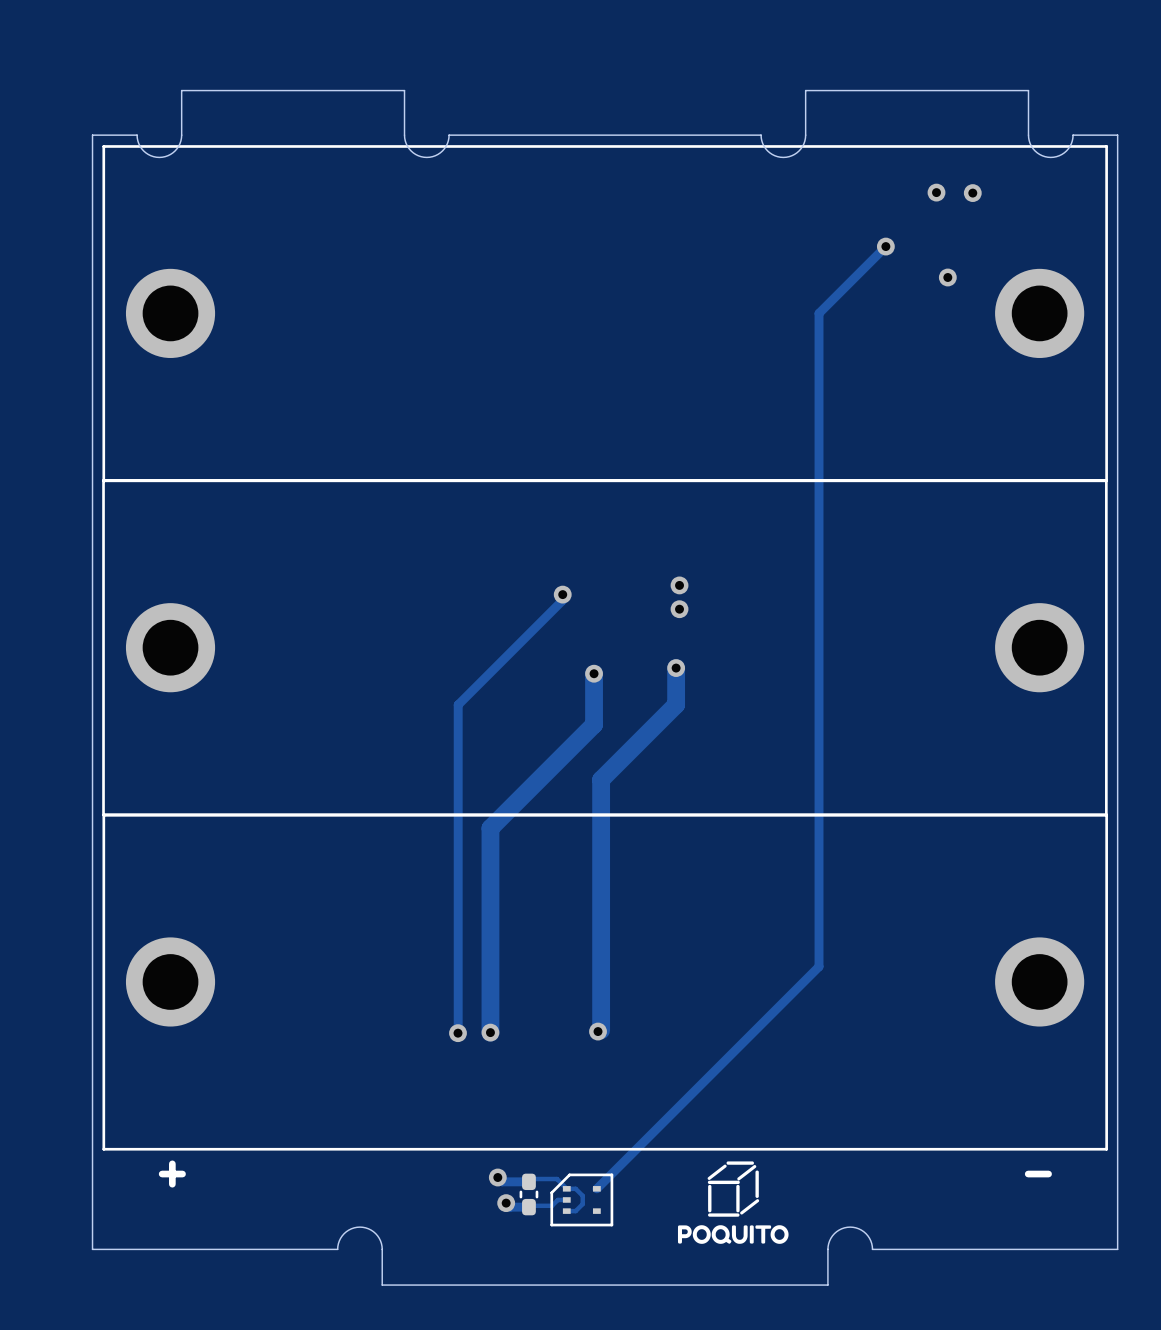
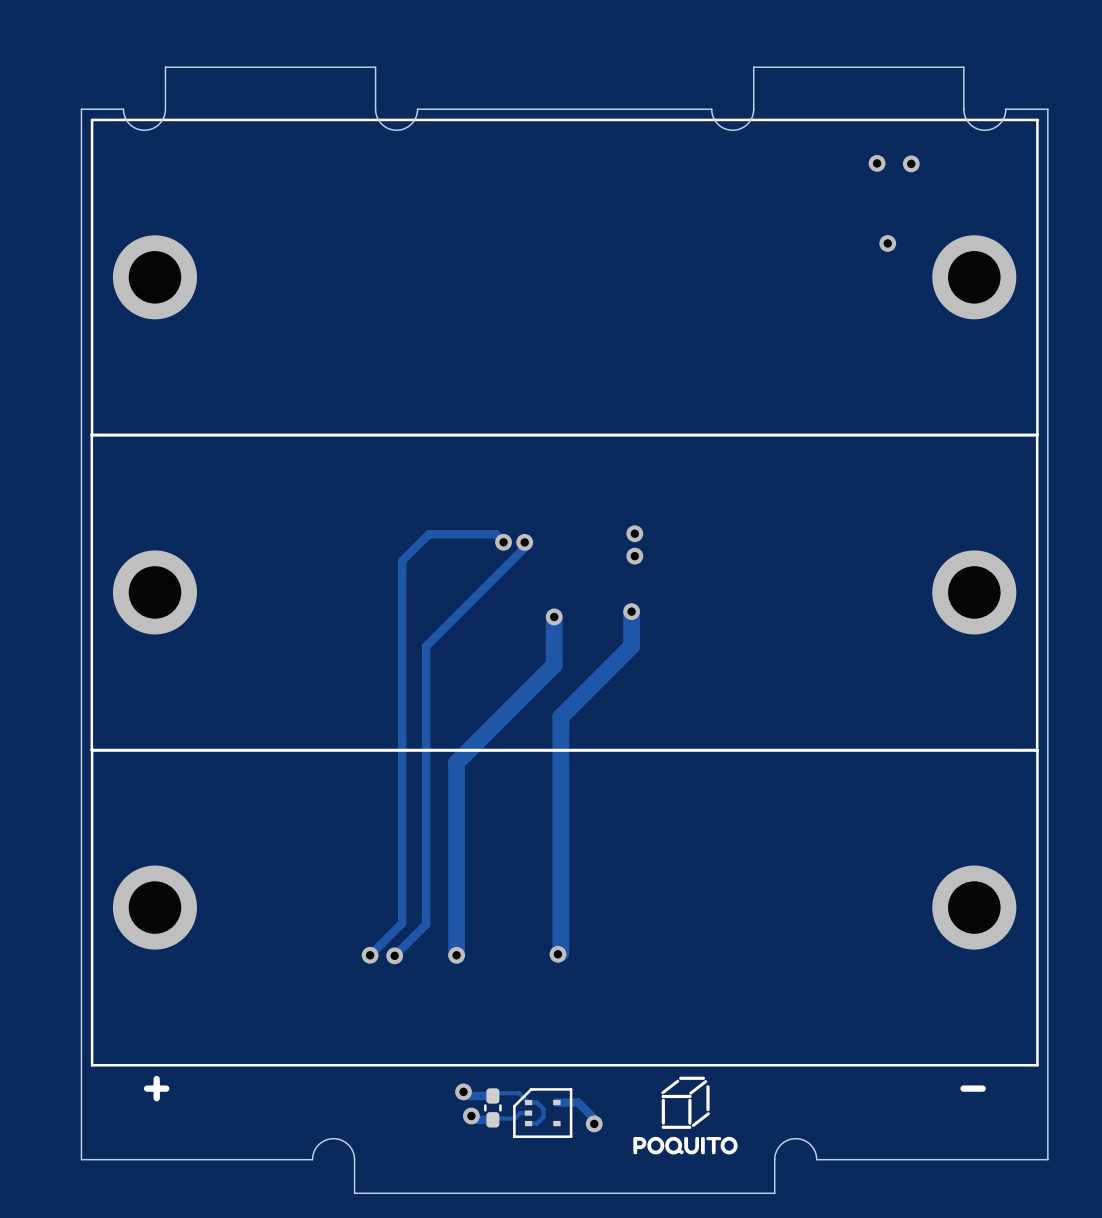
track: (885, 246) (819, 313) (819, 966) (596, 1188) -> (594, 1118) (578, 1102) (556, 1102)
via: (885, 246) -> none
track: none -> (503, 542) (495, 534) (428, 534) (402, 560) (402, 923) (370, 955)
via: none -> (503, 542)
track: (458, 999) (458, 1032) -> (426, 924) (394, 955)
via: none -> (370, 955)
via: none -> (394, 955)
via: (458, 1033) -> none
via: none -> (594, 1123)

